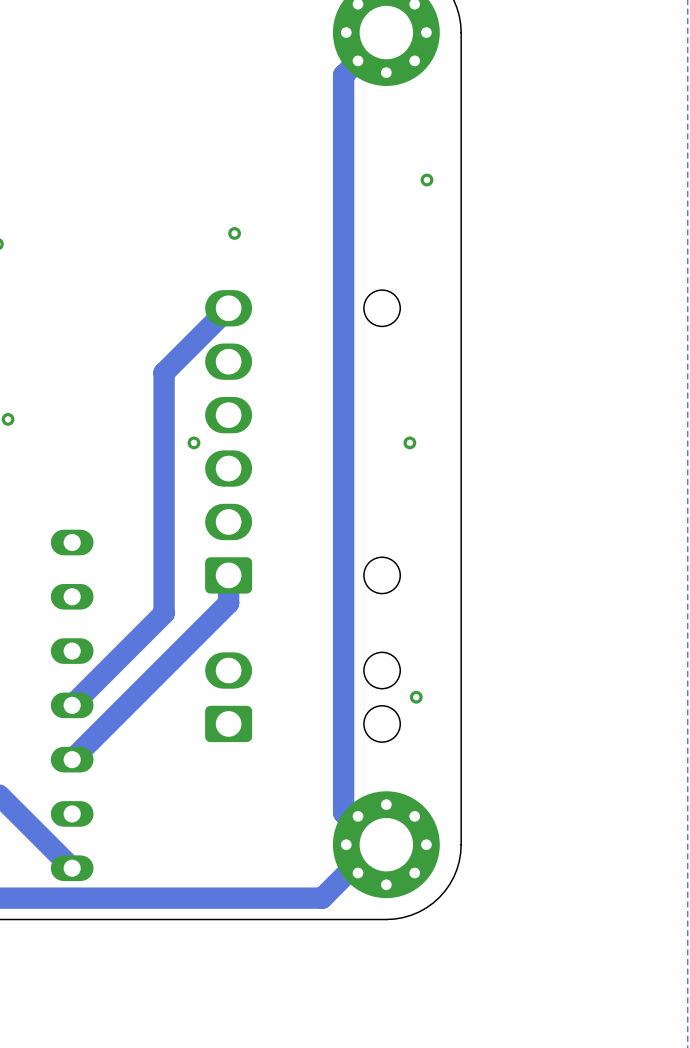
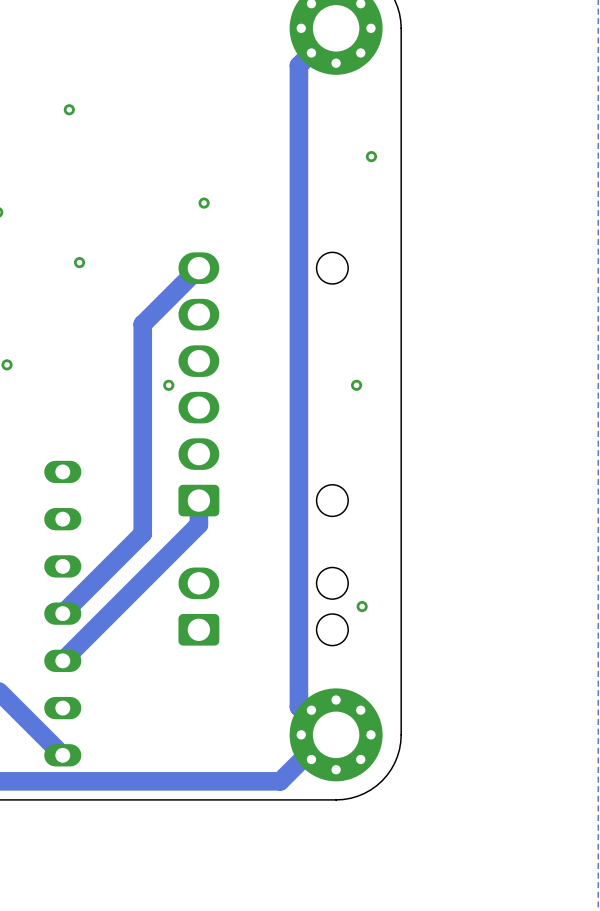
via: none -> (69, 109)
via: none -> (79, 262)

